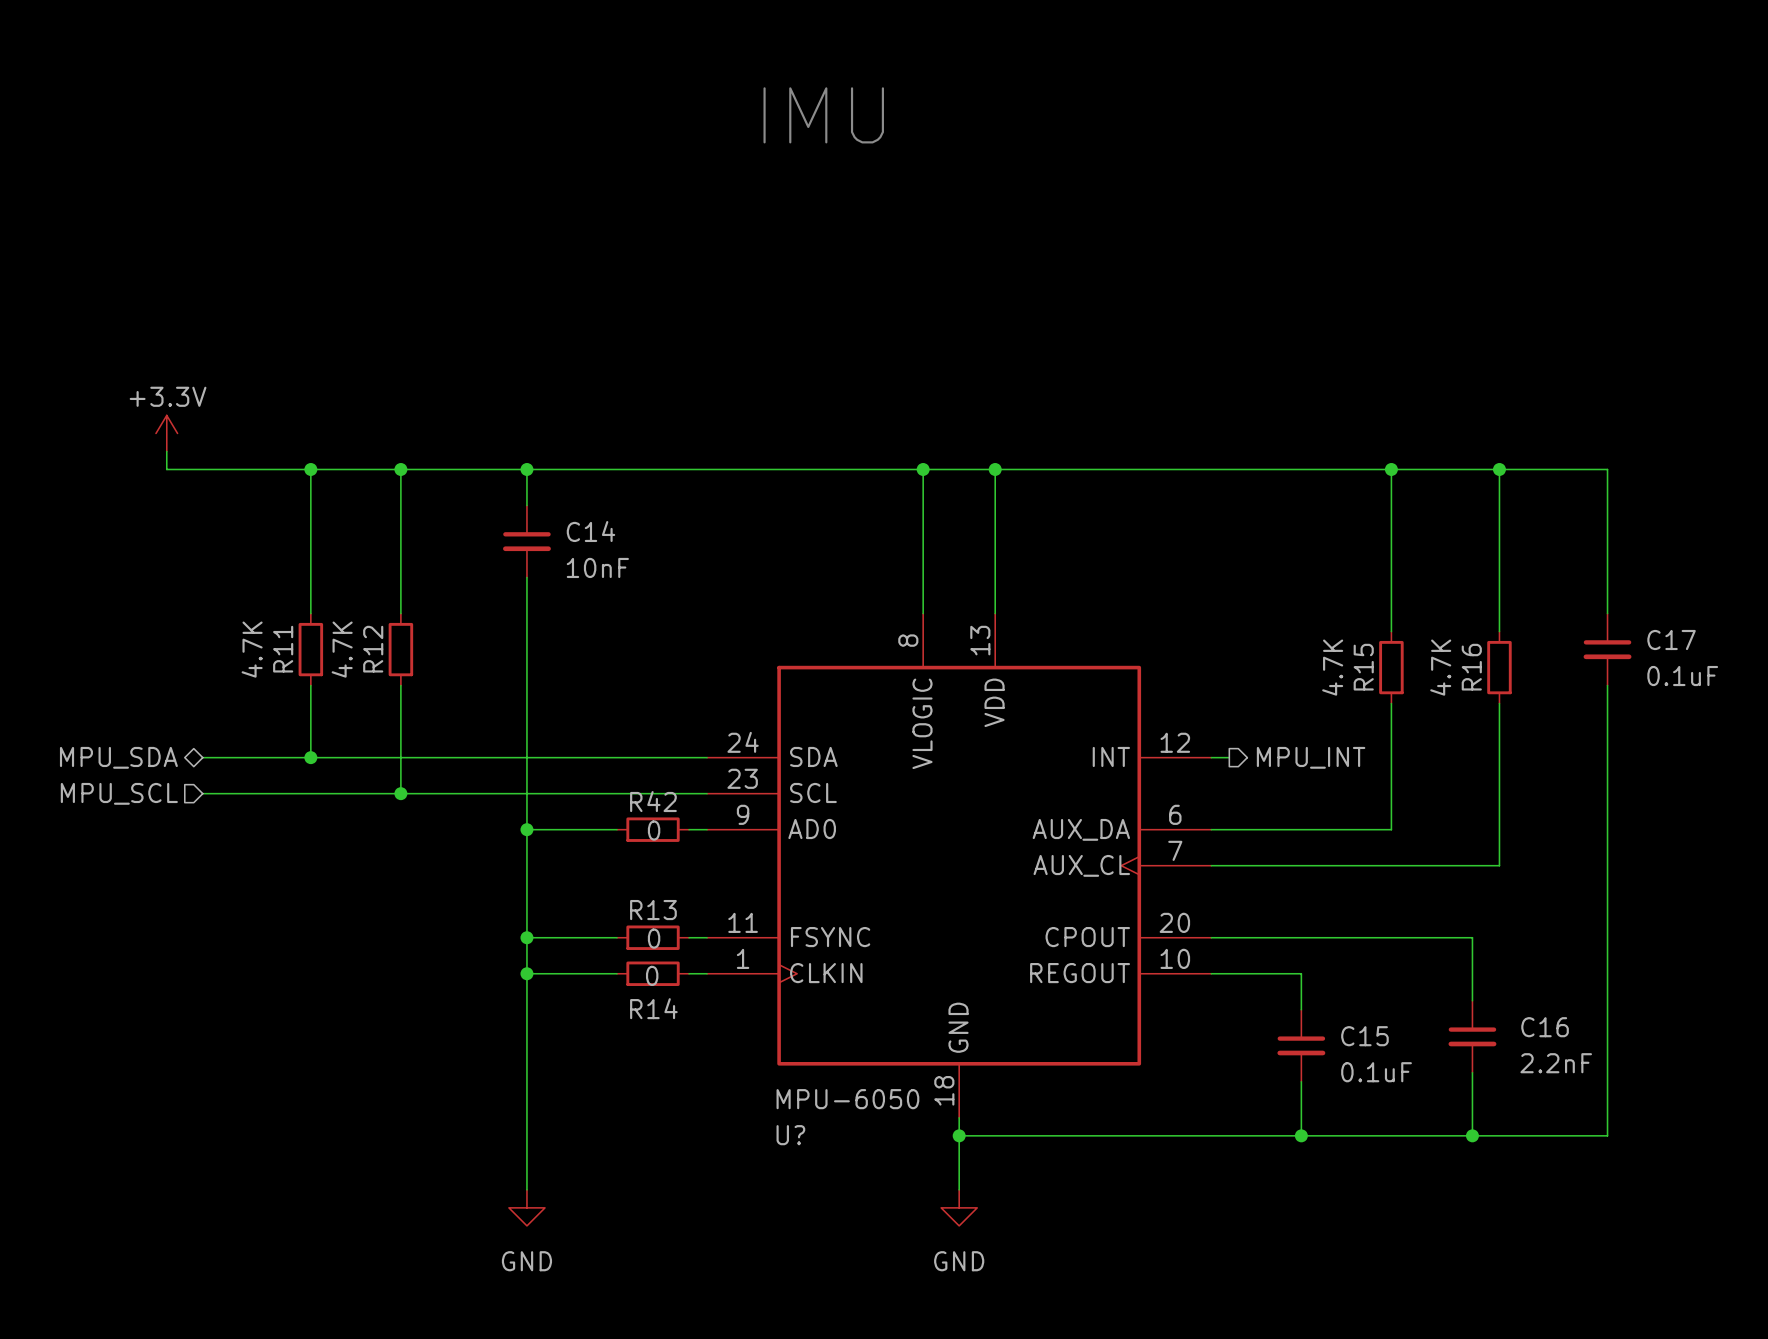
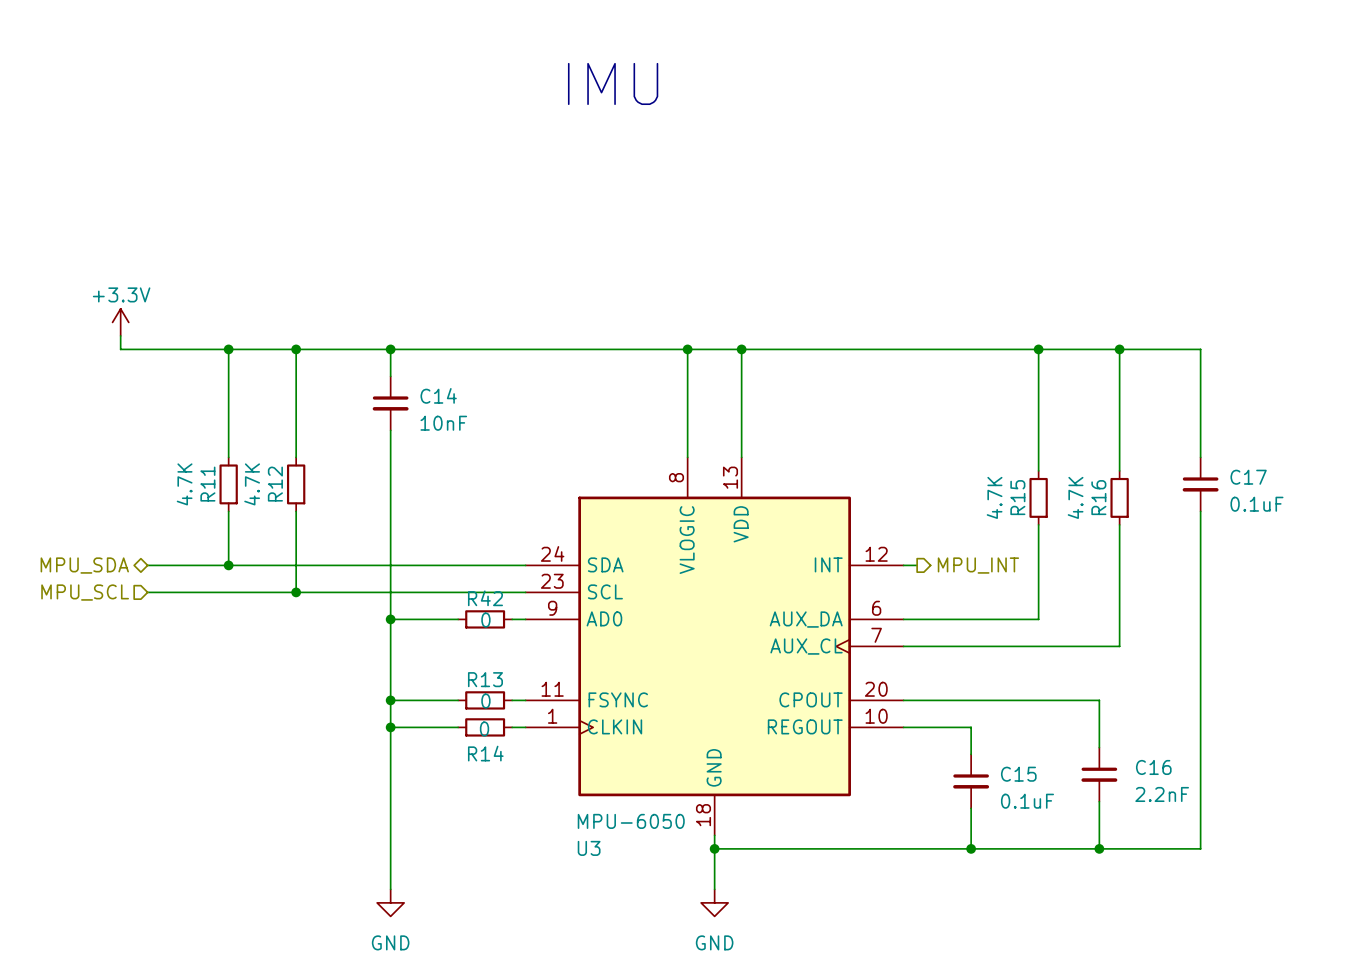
U? name: U? (790, 1135) -> U3 (589, 848)

